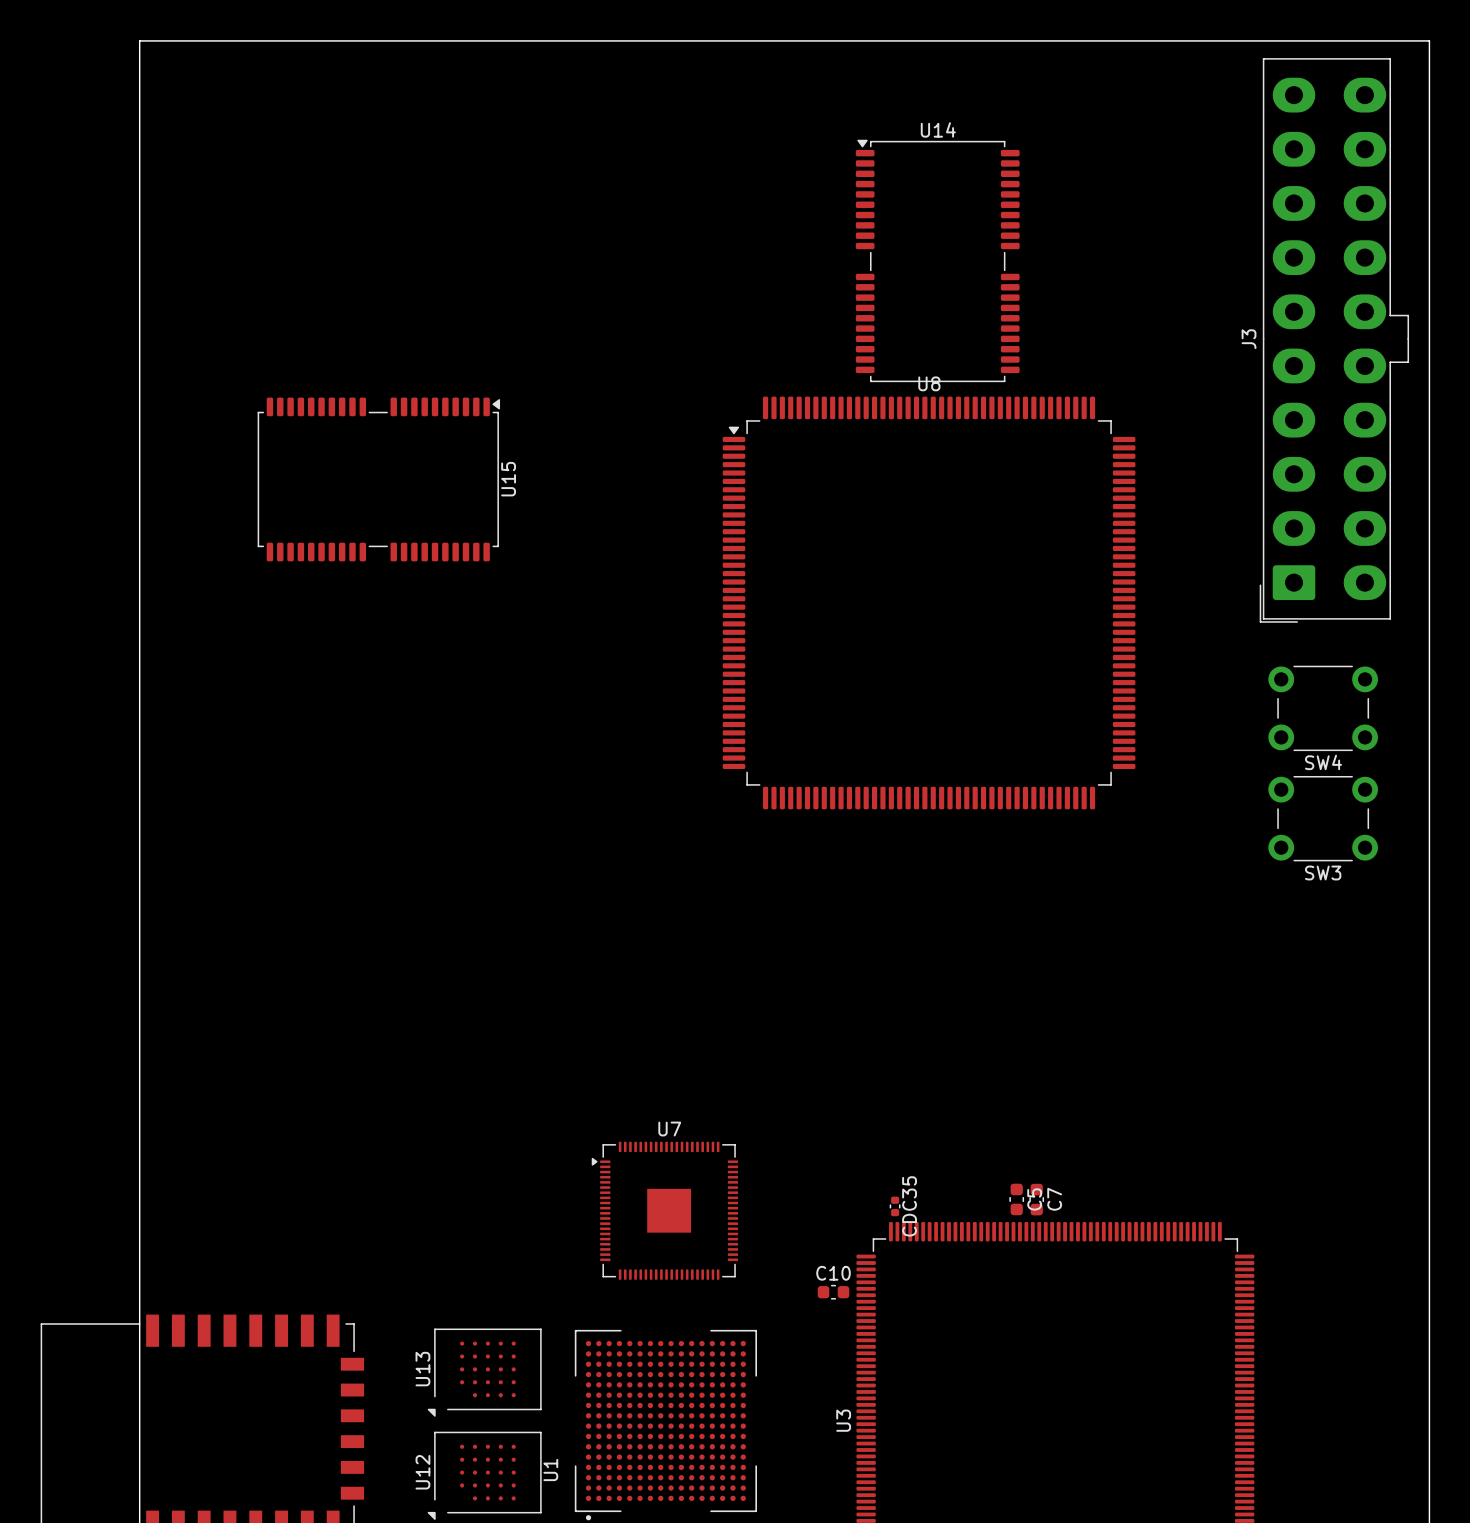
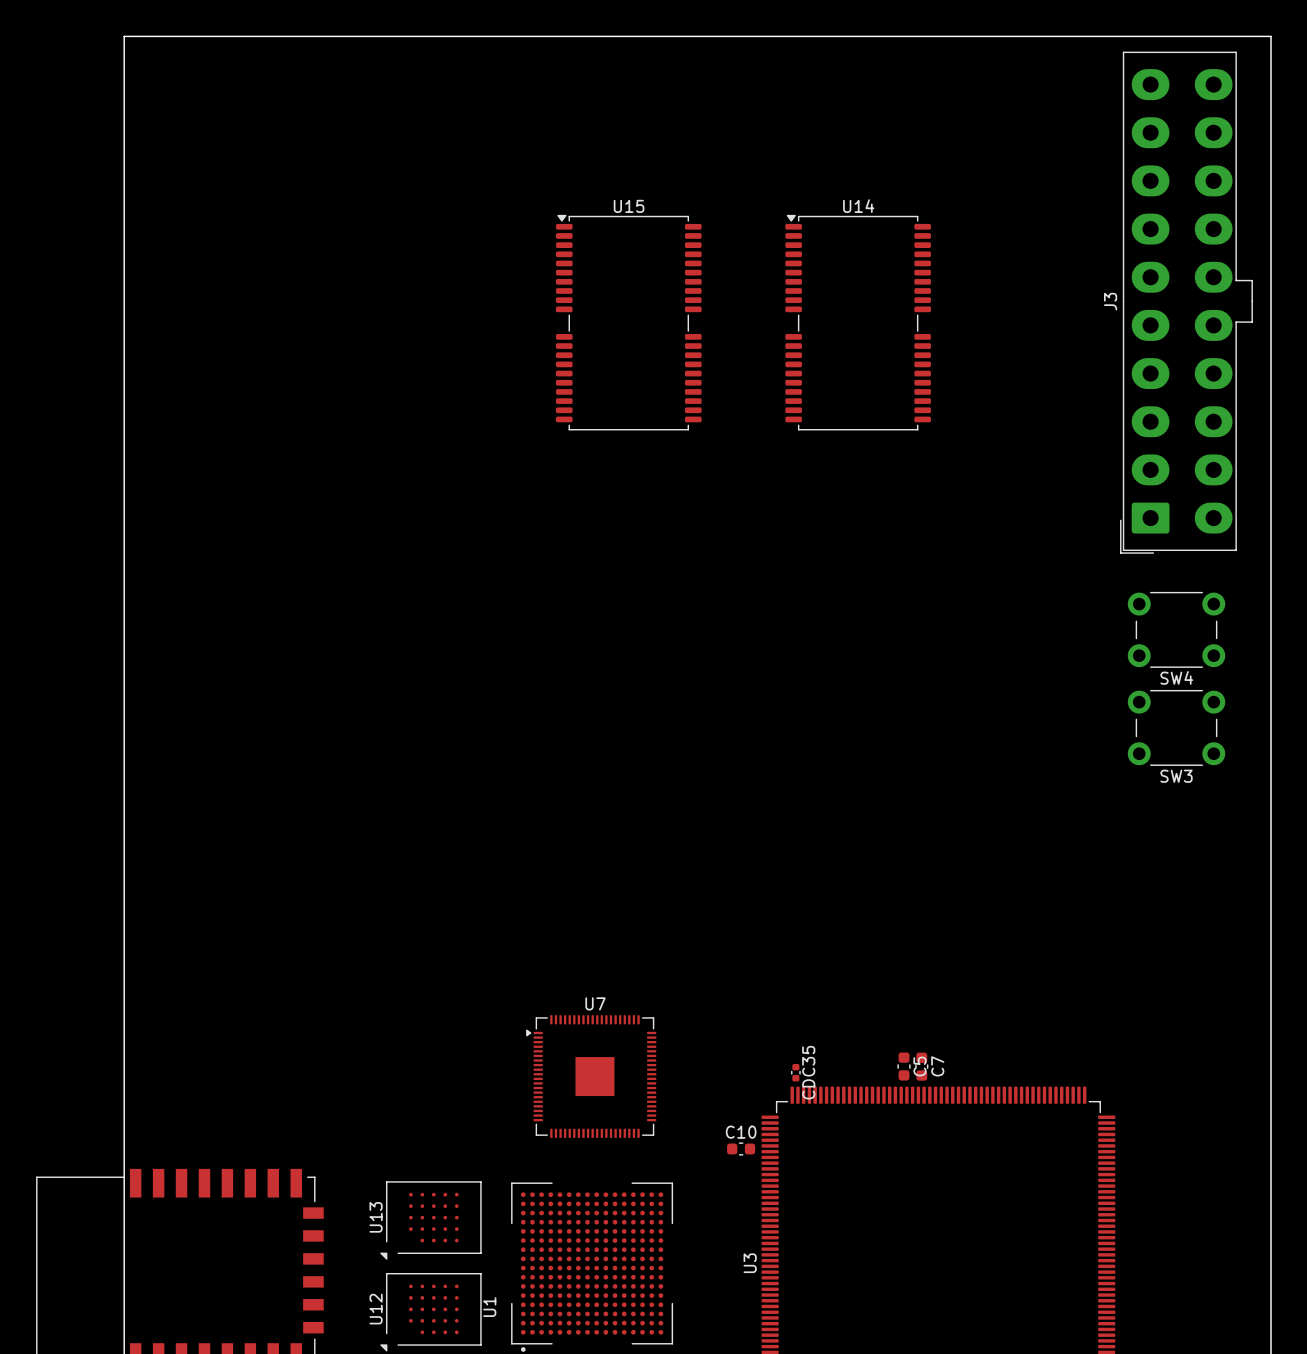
U14 position: (937, 260) -> (858, 322)
U15 rotation: 0° (378, 479) -> 90° counterclockwise (628, 322)
U15 position: (378, 479) -> (628, 322)
U8: (929, 602) -> none

